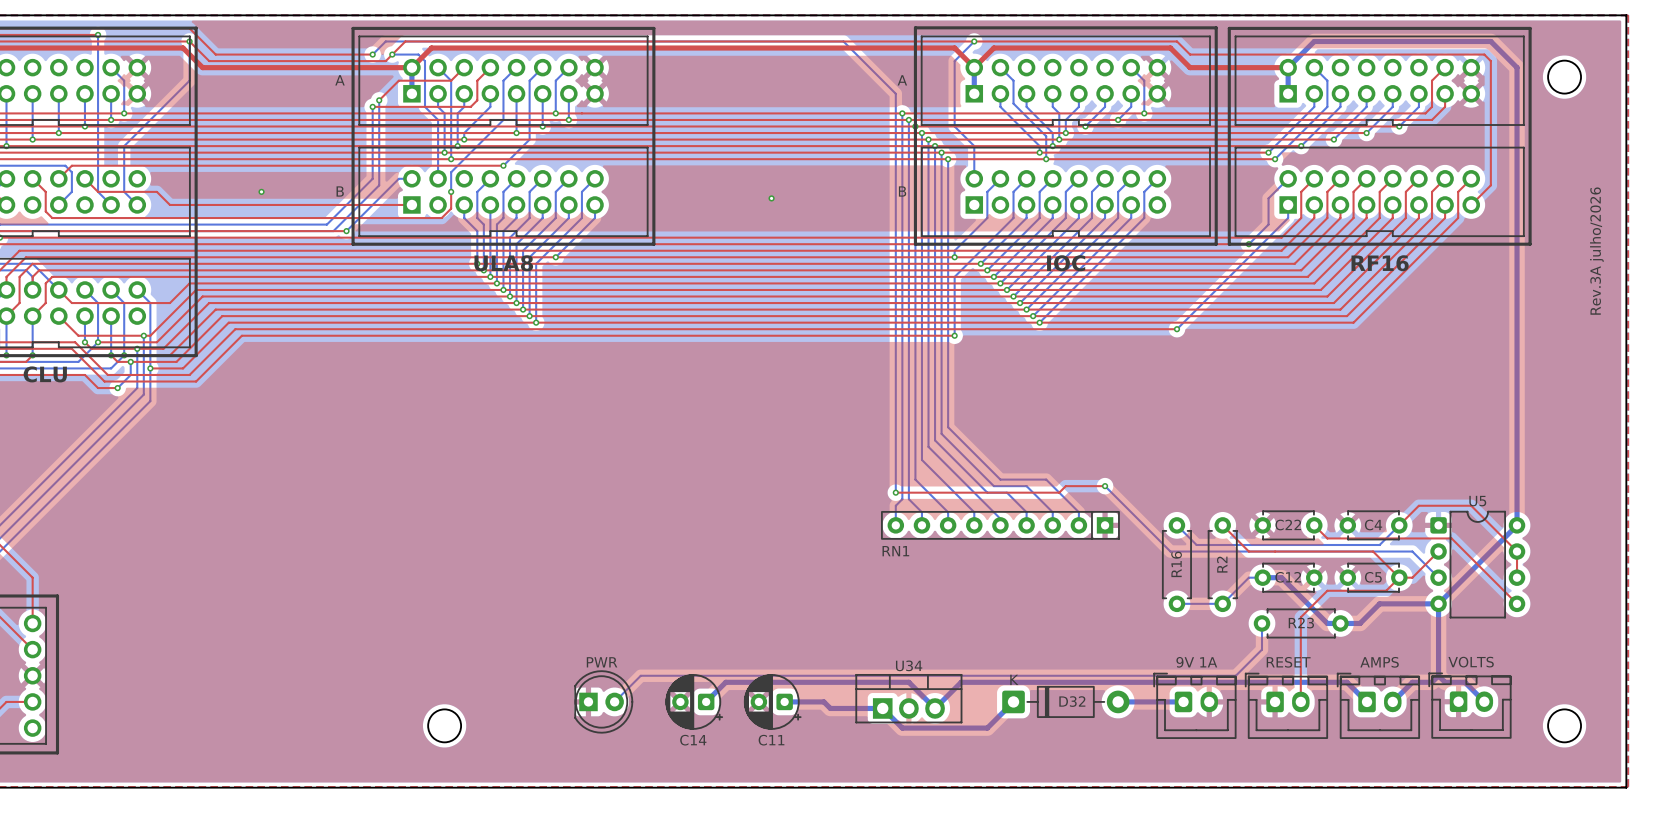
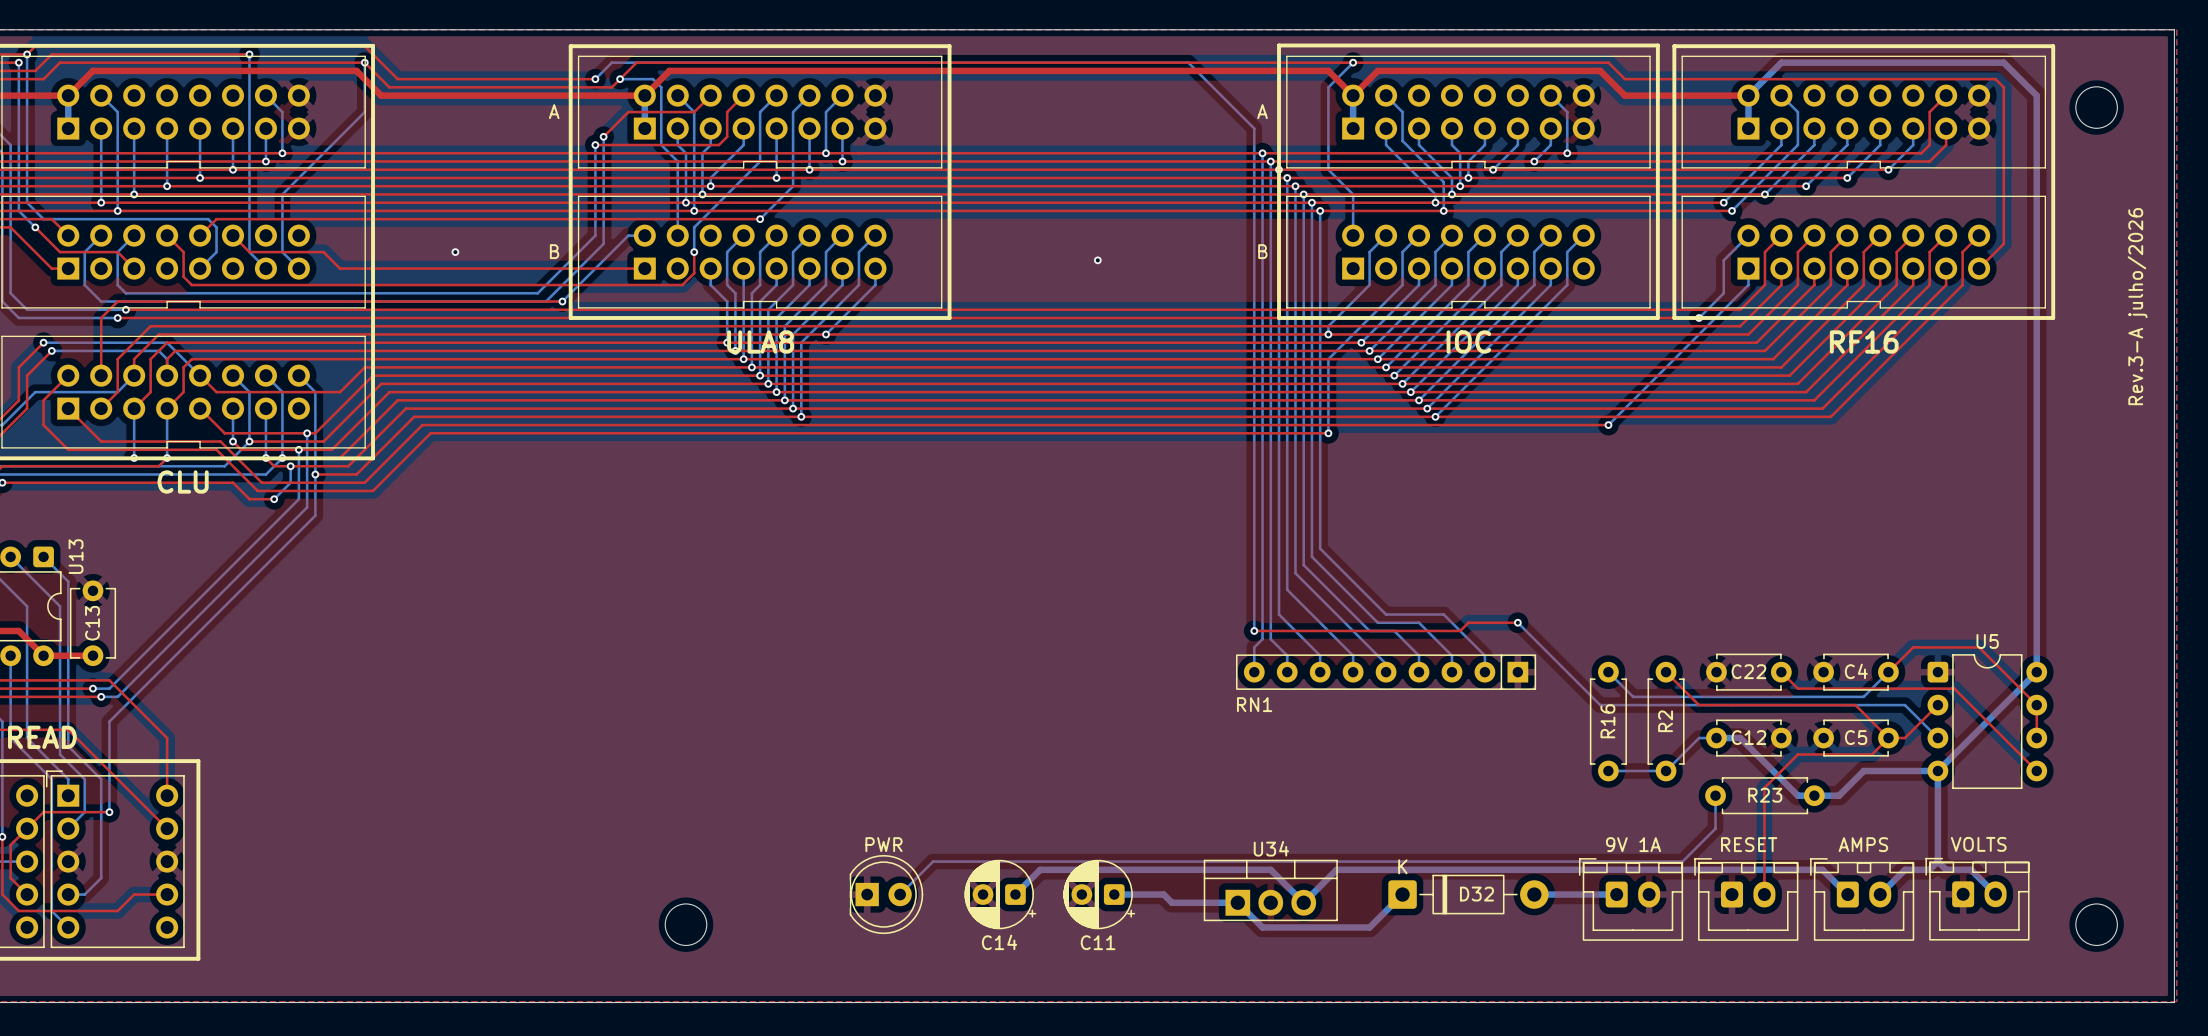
text: Rev.3A julho/2026 (1596, 251) -> Rev.3-A julho/2026 (2137, 306)

